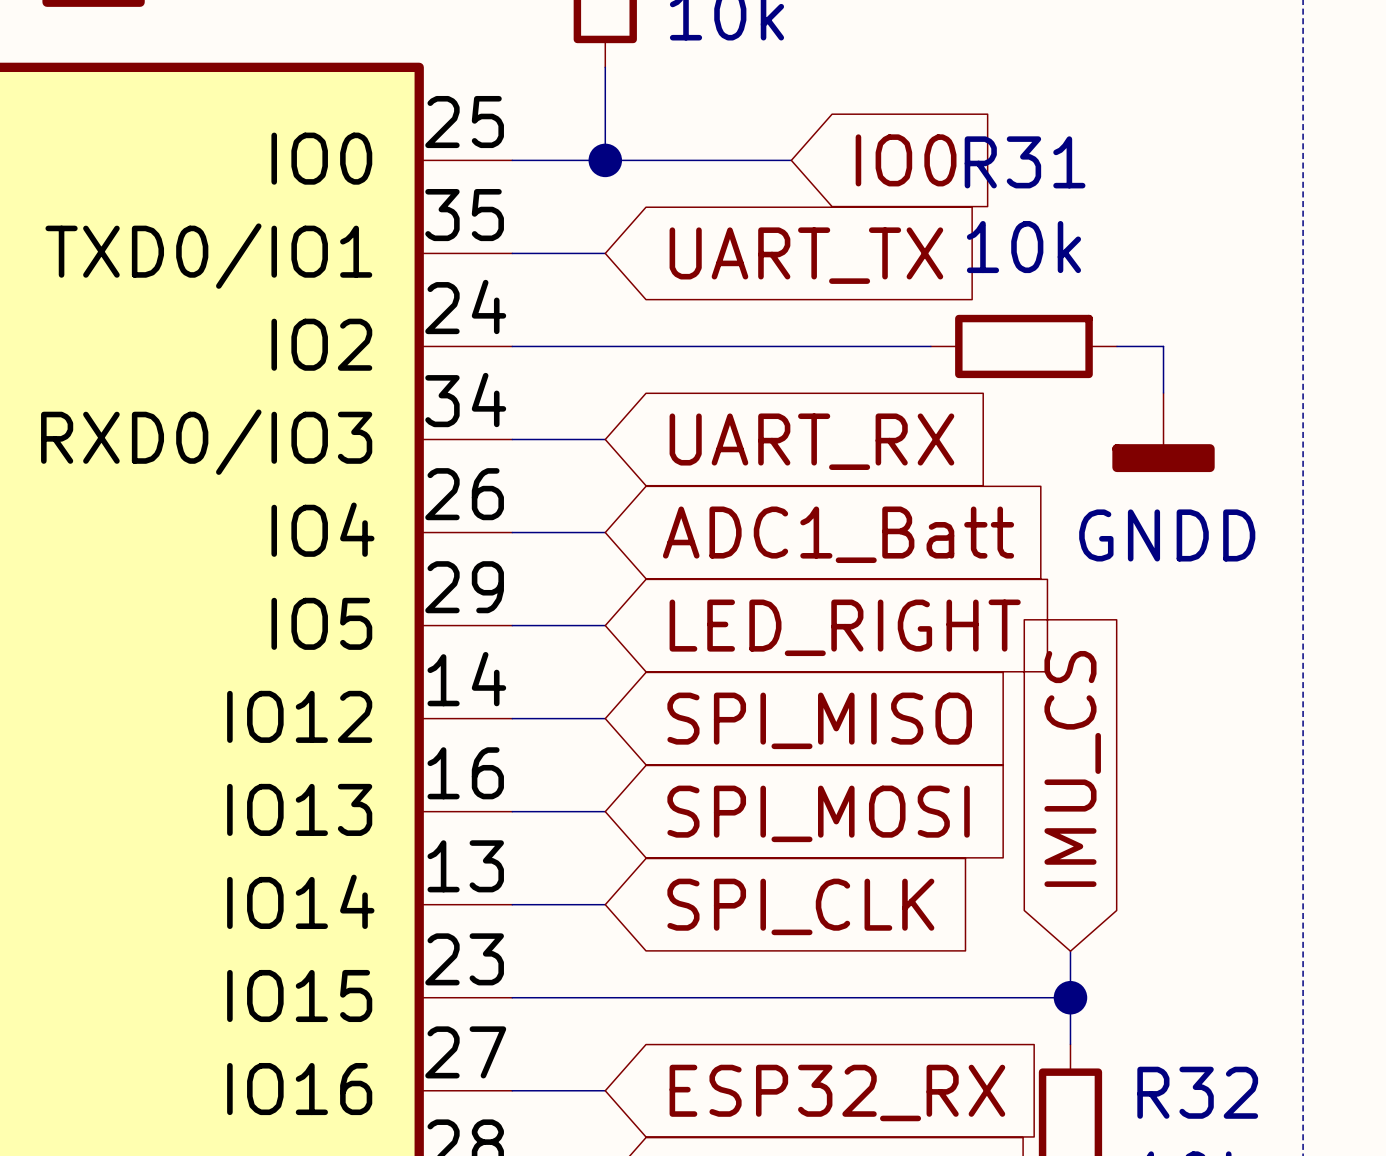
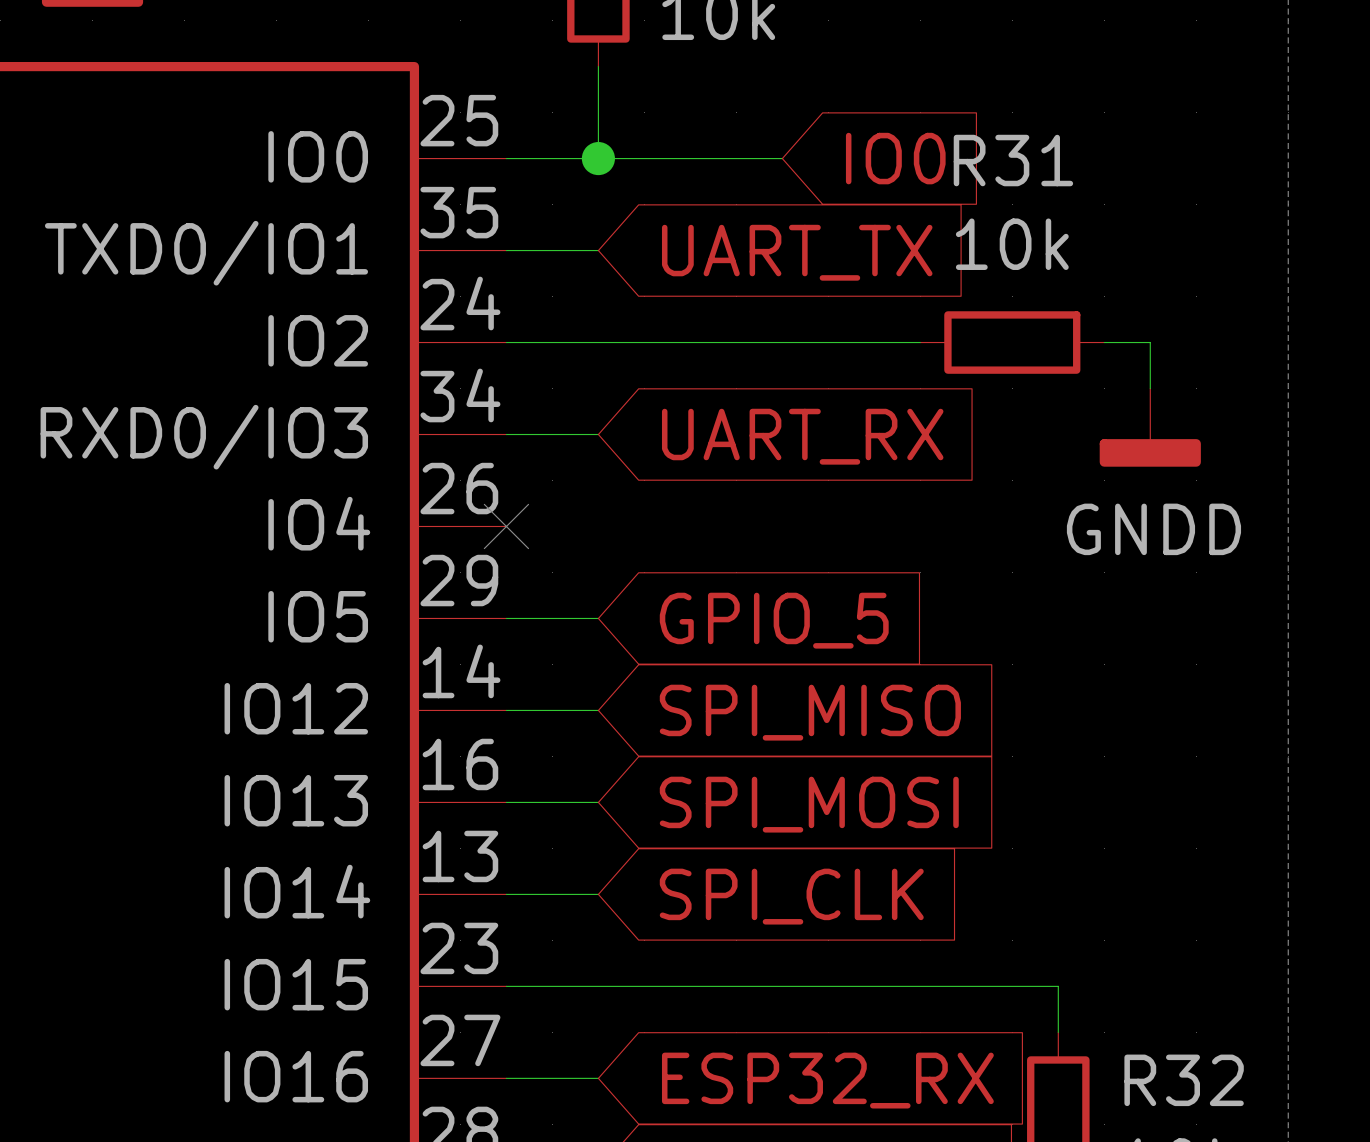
wire: (512, 532) (605, 532) -> none
no-connect mark: none -> (506, 526)
global label: ADC1_Batt (838, 534) -> none
global label: LED_RIGHT (845, 627) -> GPIO_5 (774, 620)
global label: IMU_CS (1072, 768) -> none
wire: (1070, 951) (1070, 997) -> none
junction: (1070, 997) -> none

